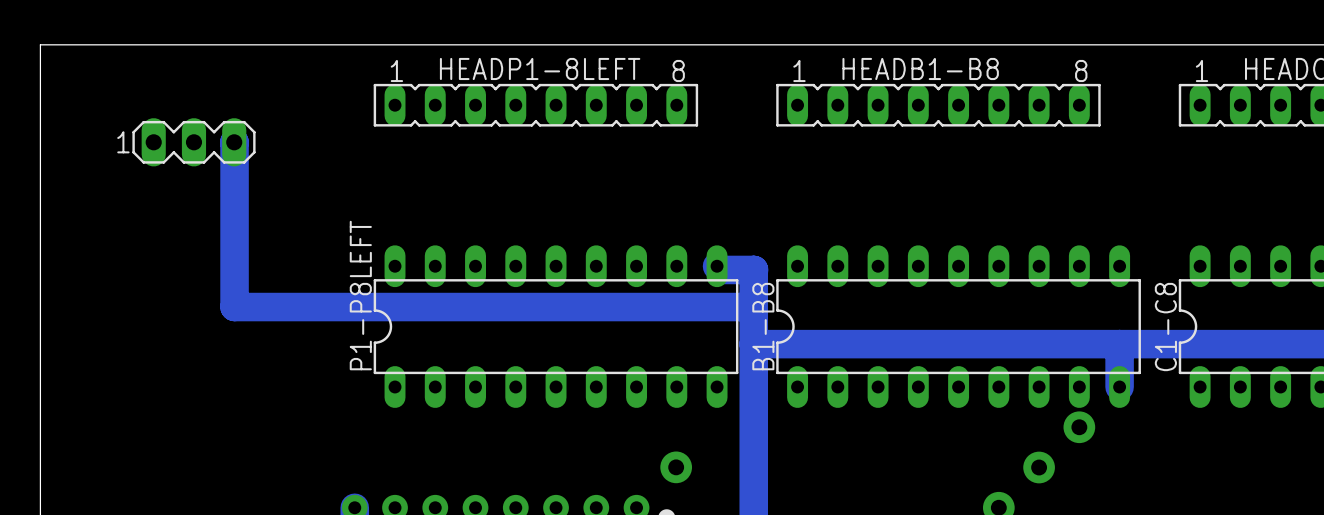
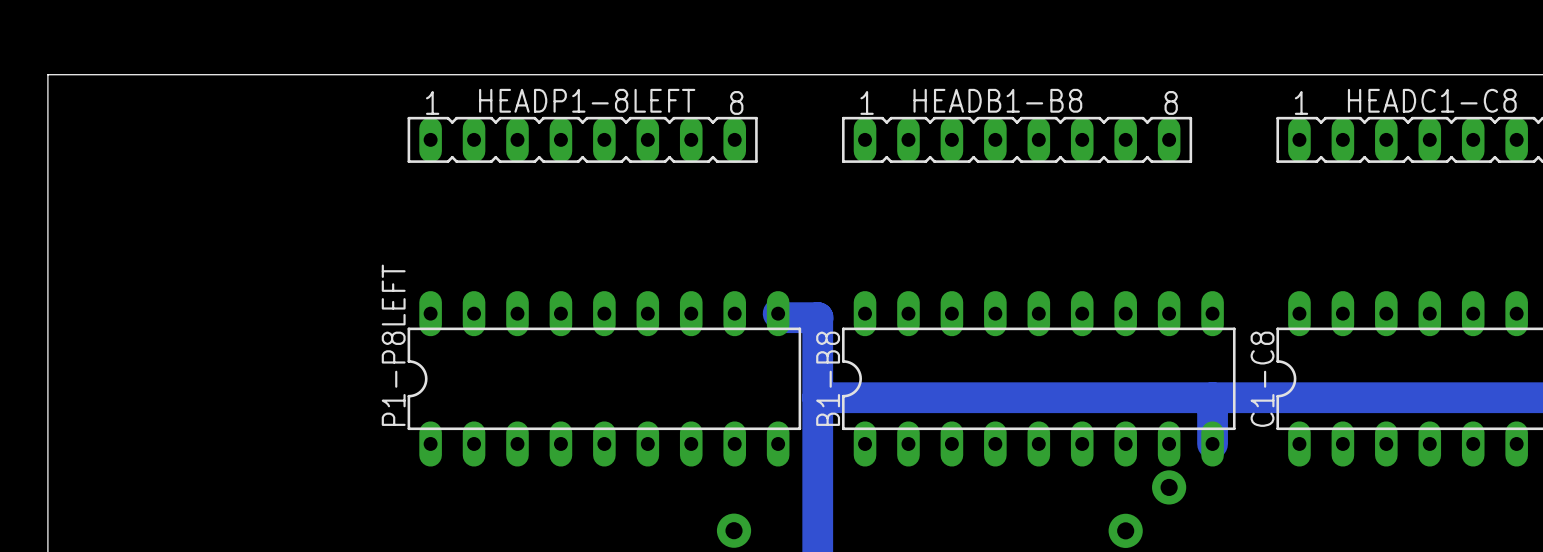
part: (193, 142) -> none
bottom track: (234, 142) (234, 307) (753, 307) -> none

